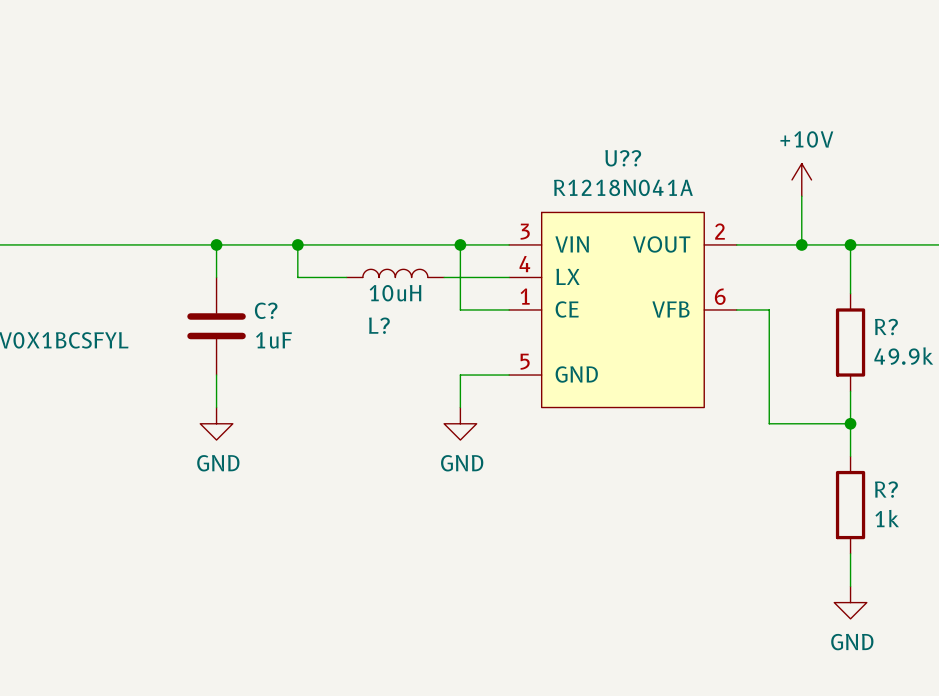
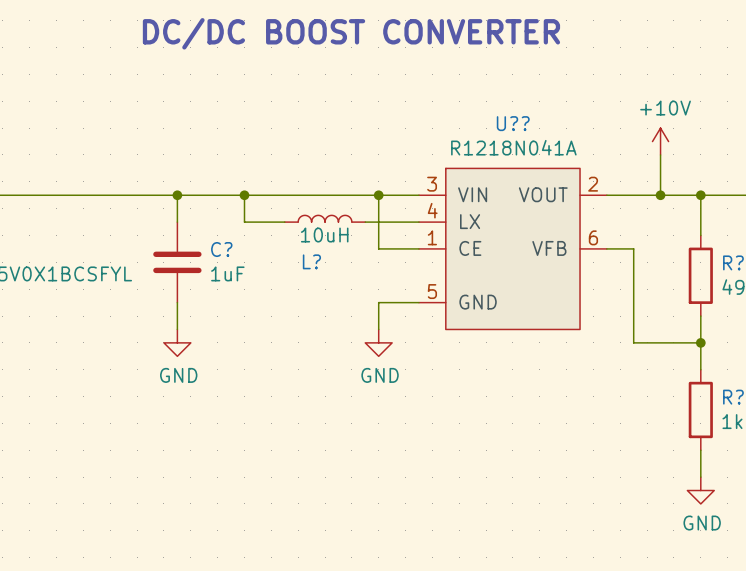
text: none -> DC/DC BOOST CONVERTER (351, 33)

